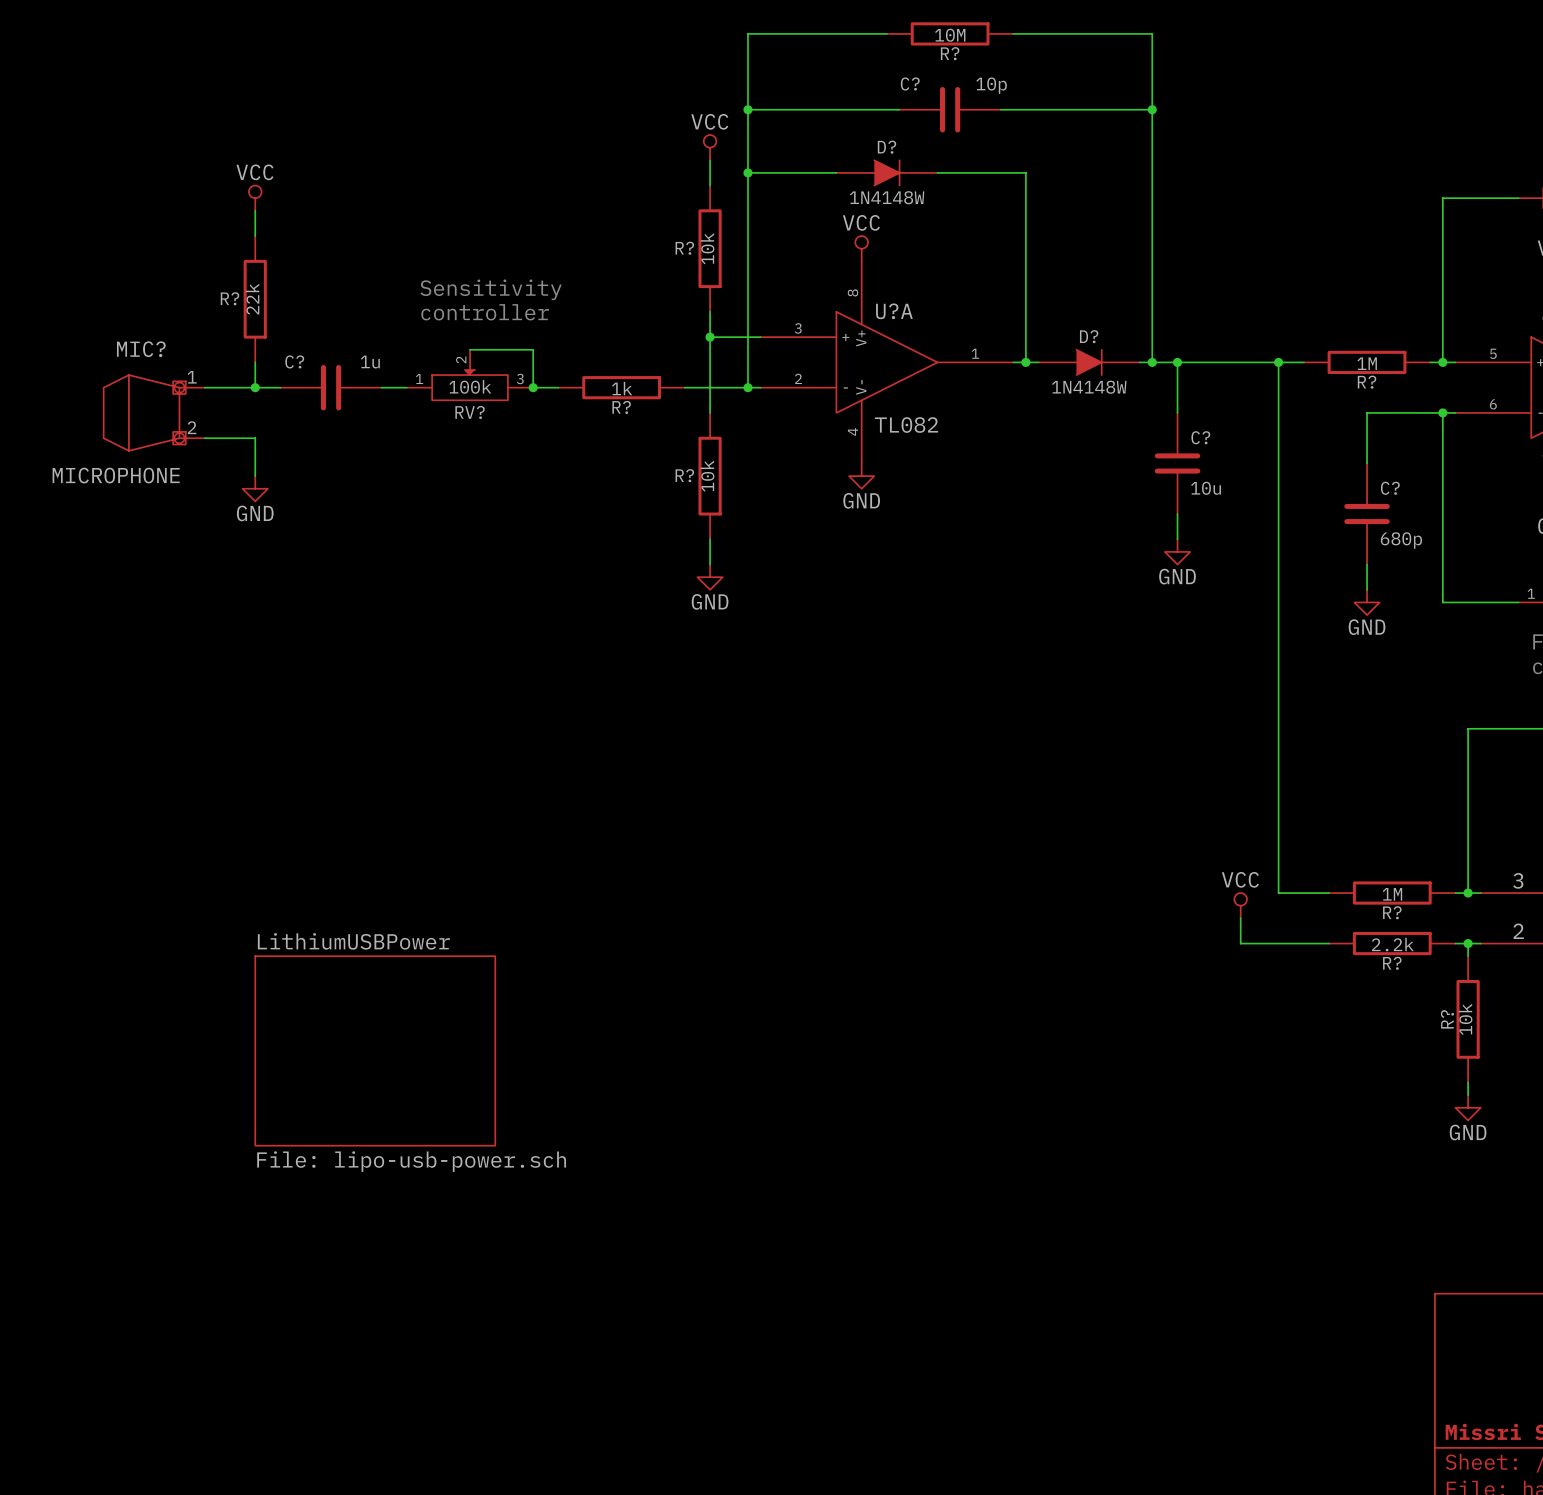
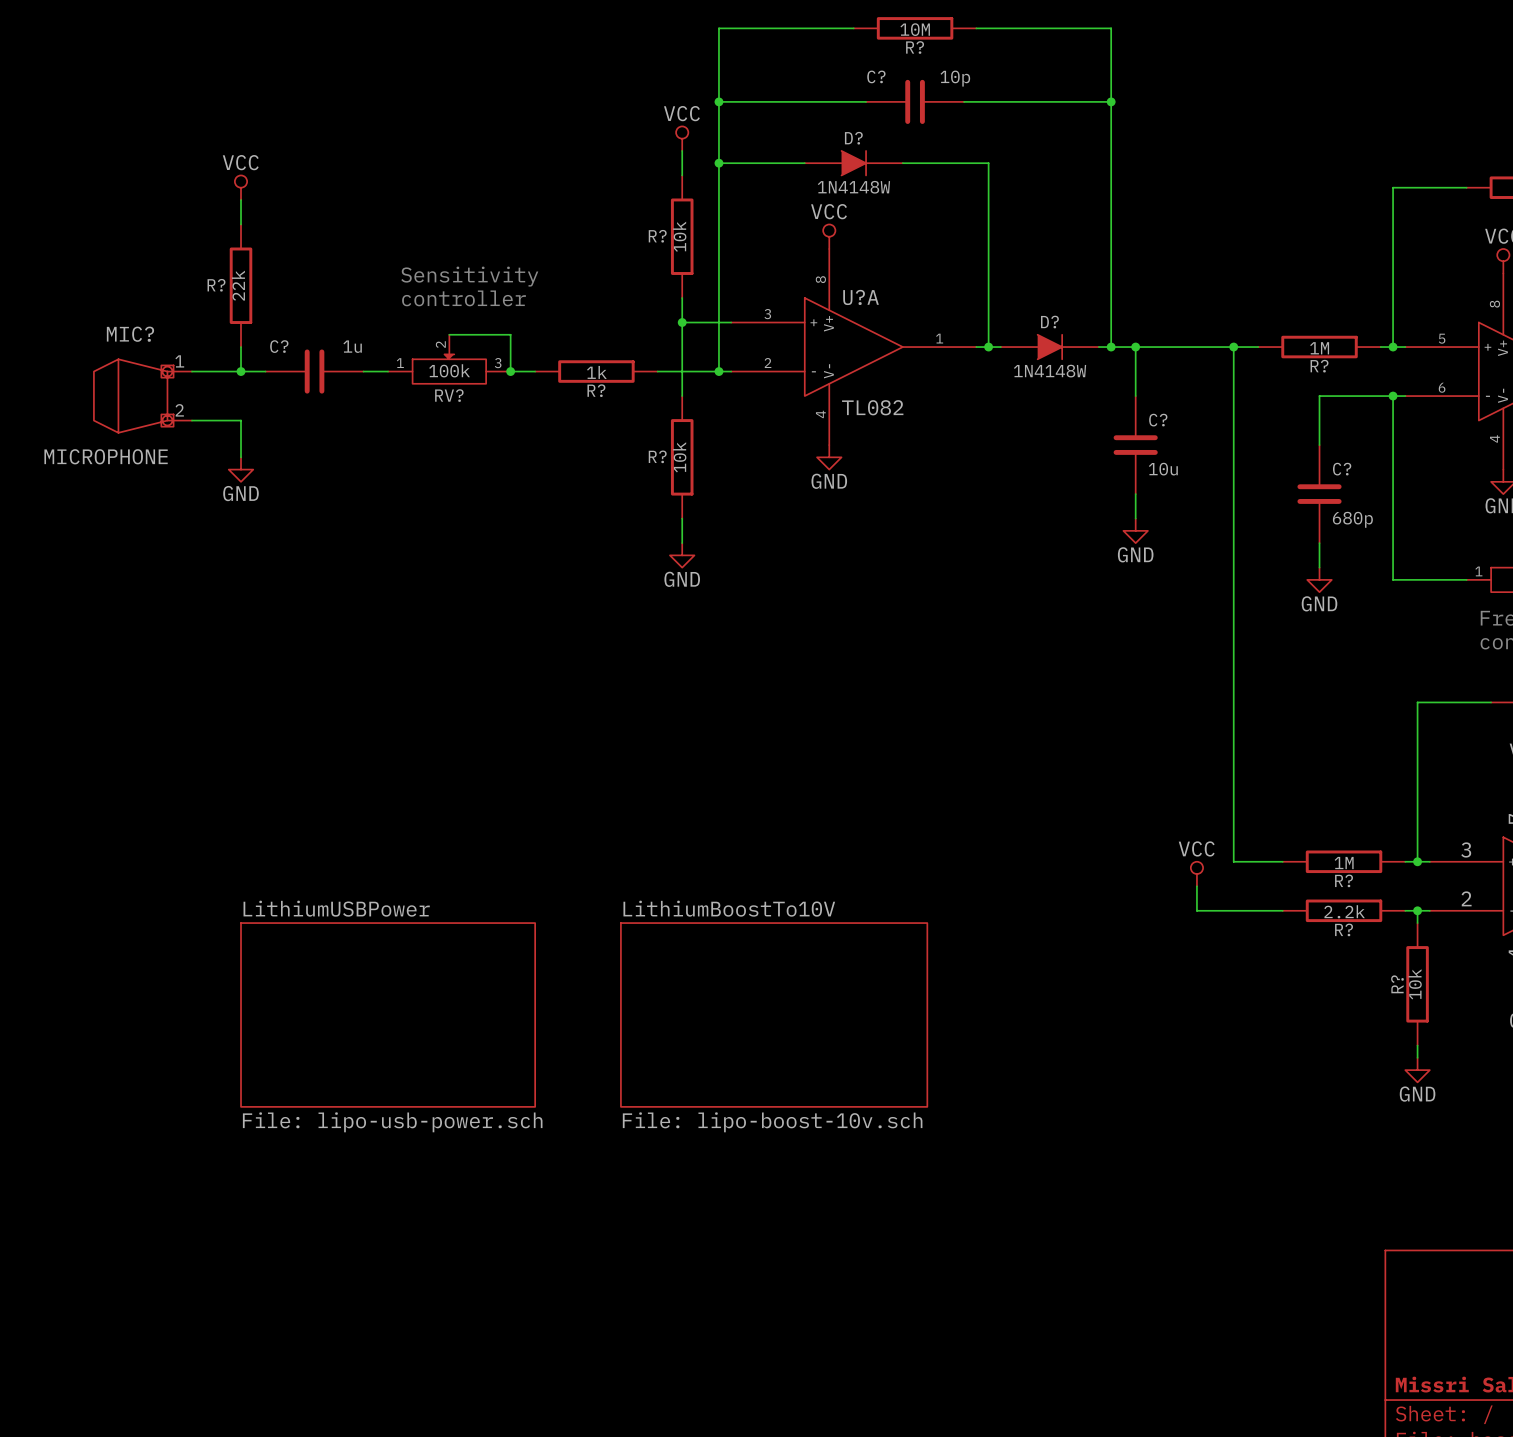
sheet LithiumUSBPower: File: lipo-usb-power.sch (375, 1050) -> none
sheet LithiumUSBPower: none -> File: lipo-usb-power.sch (388, 1014)
sheet LithiumBoostTo10V: none -> File: lipo-boost-10v.sch (774, 1014)

